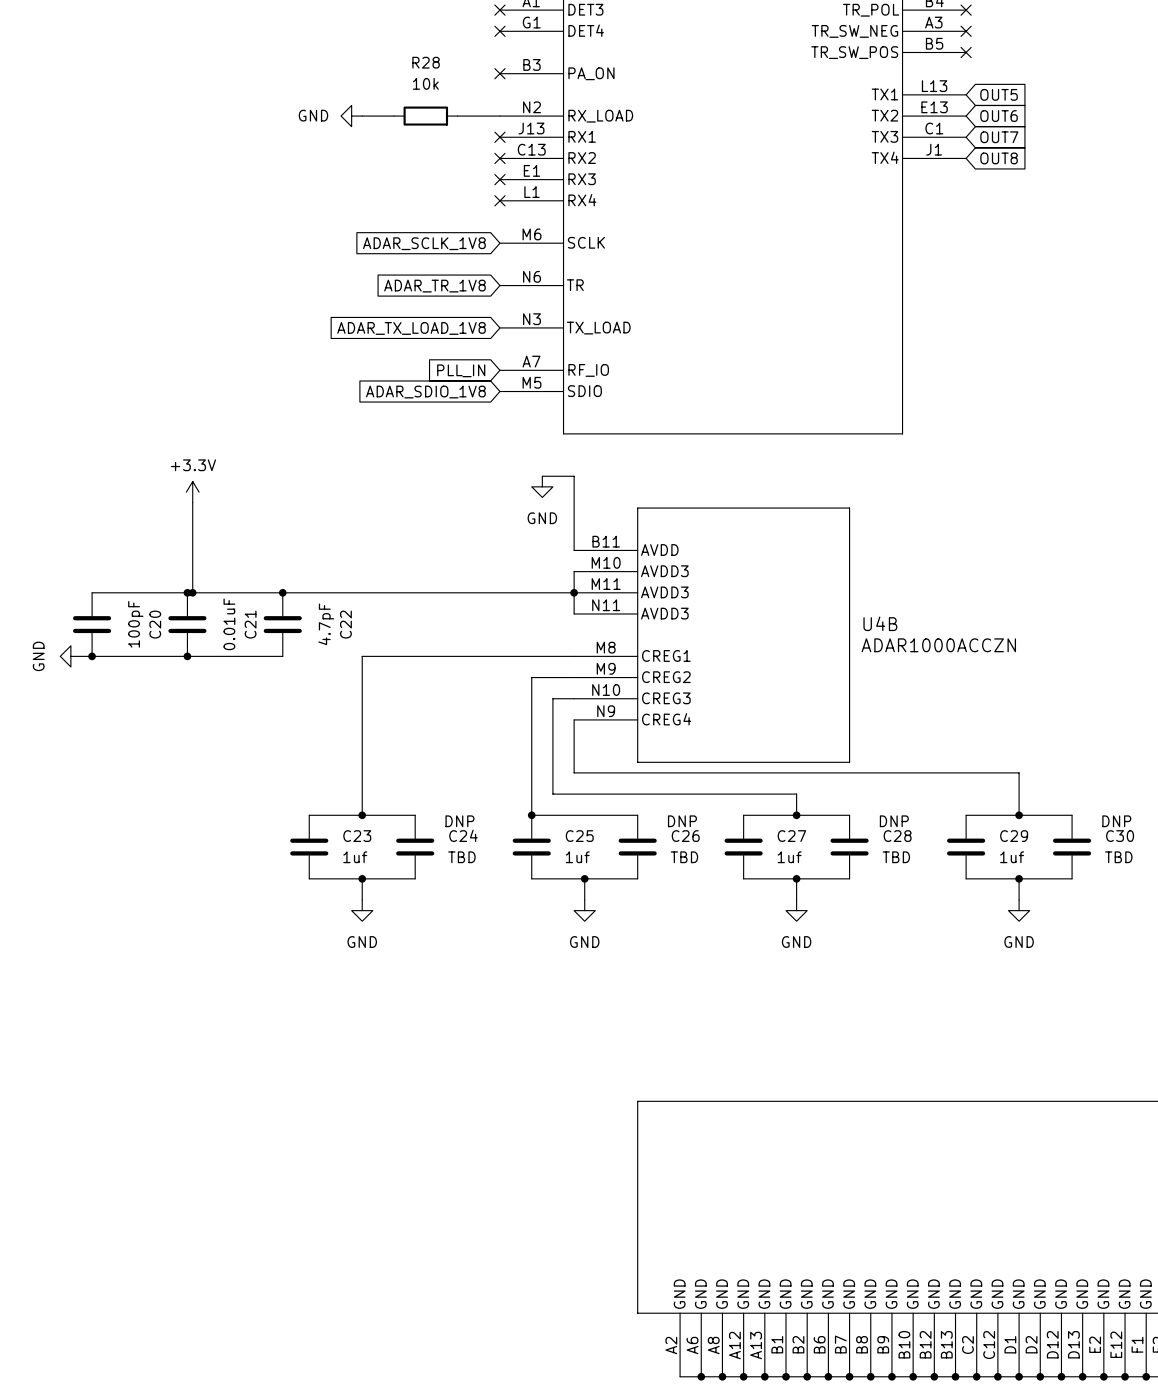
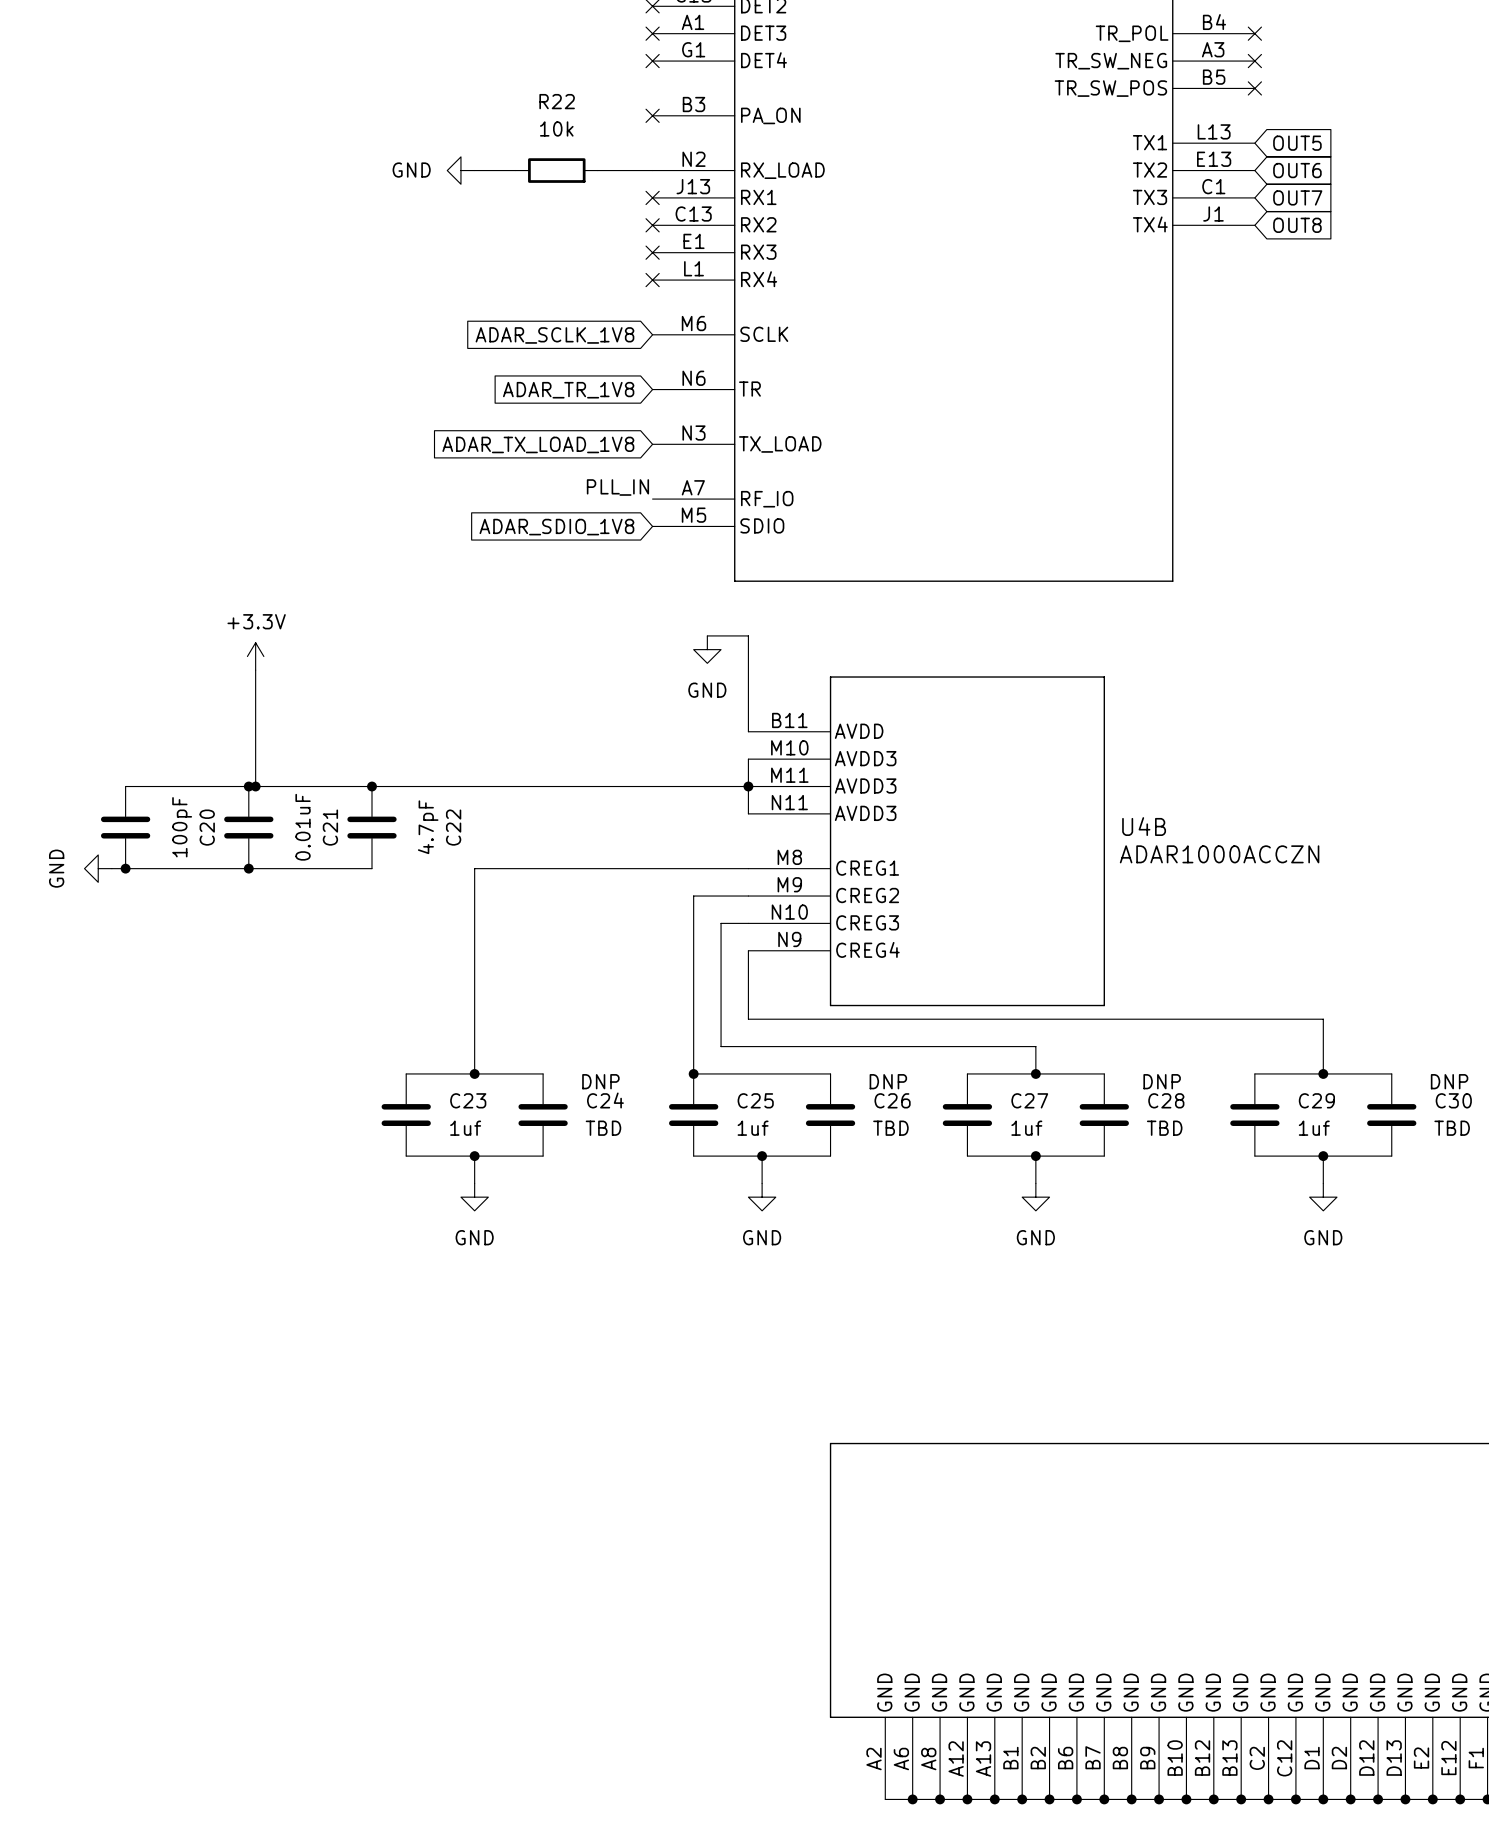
R28 name: R28 (426, 62) -> R22 (557, 101)
label: none -> PLL_IN (617, 487)
global label: PLL_IN (461, 370) -> none

